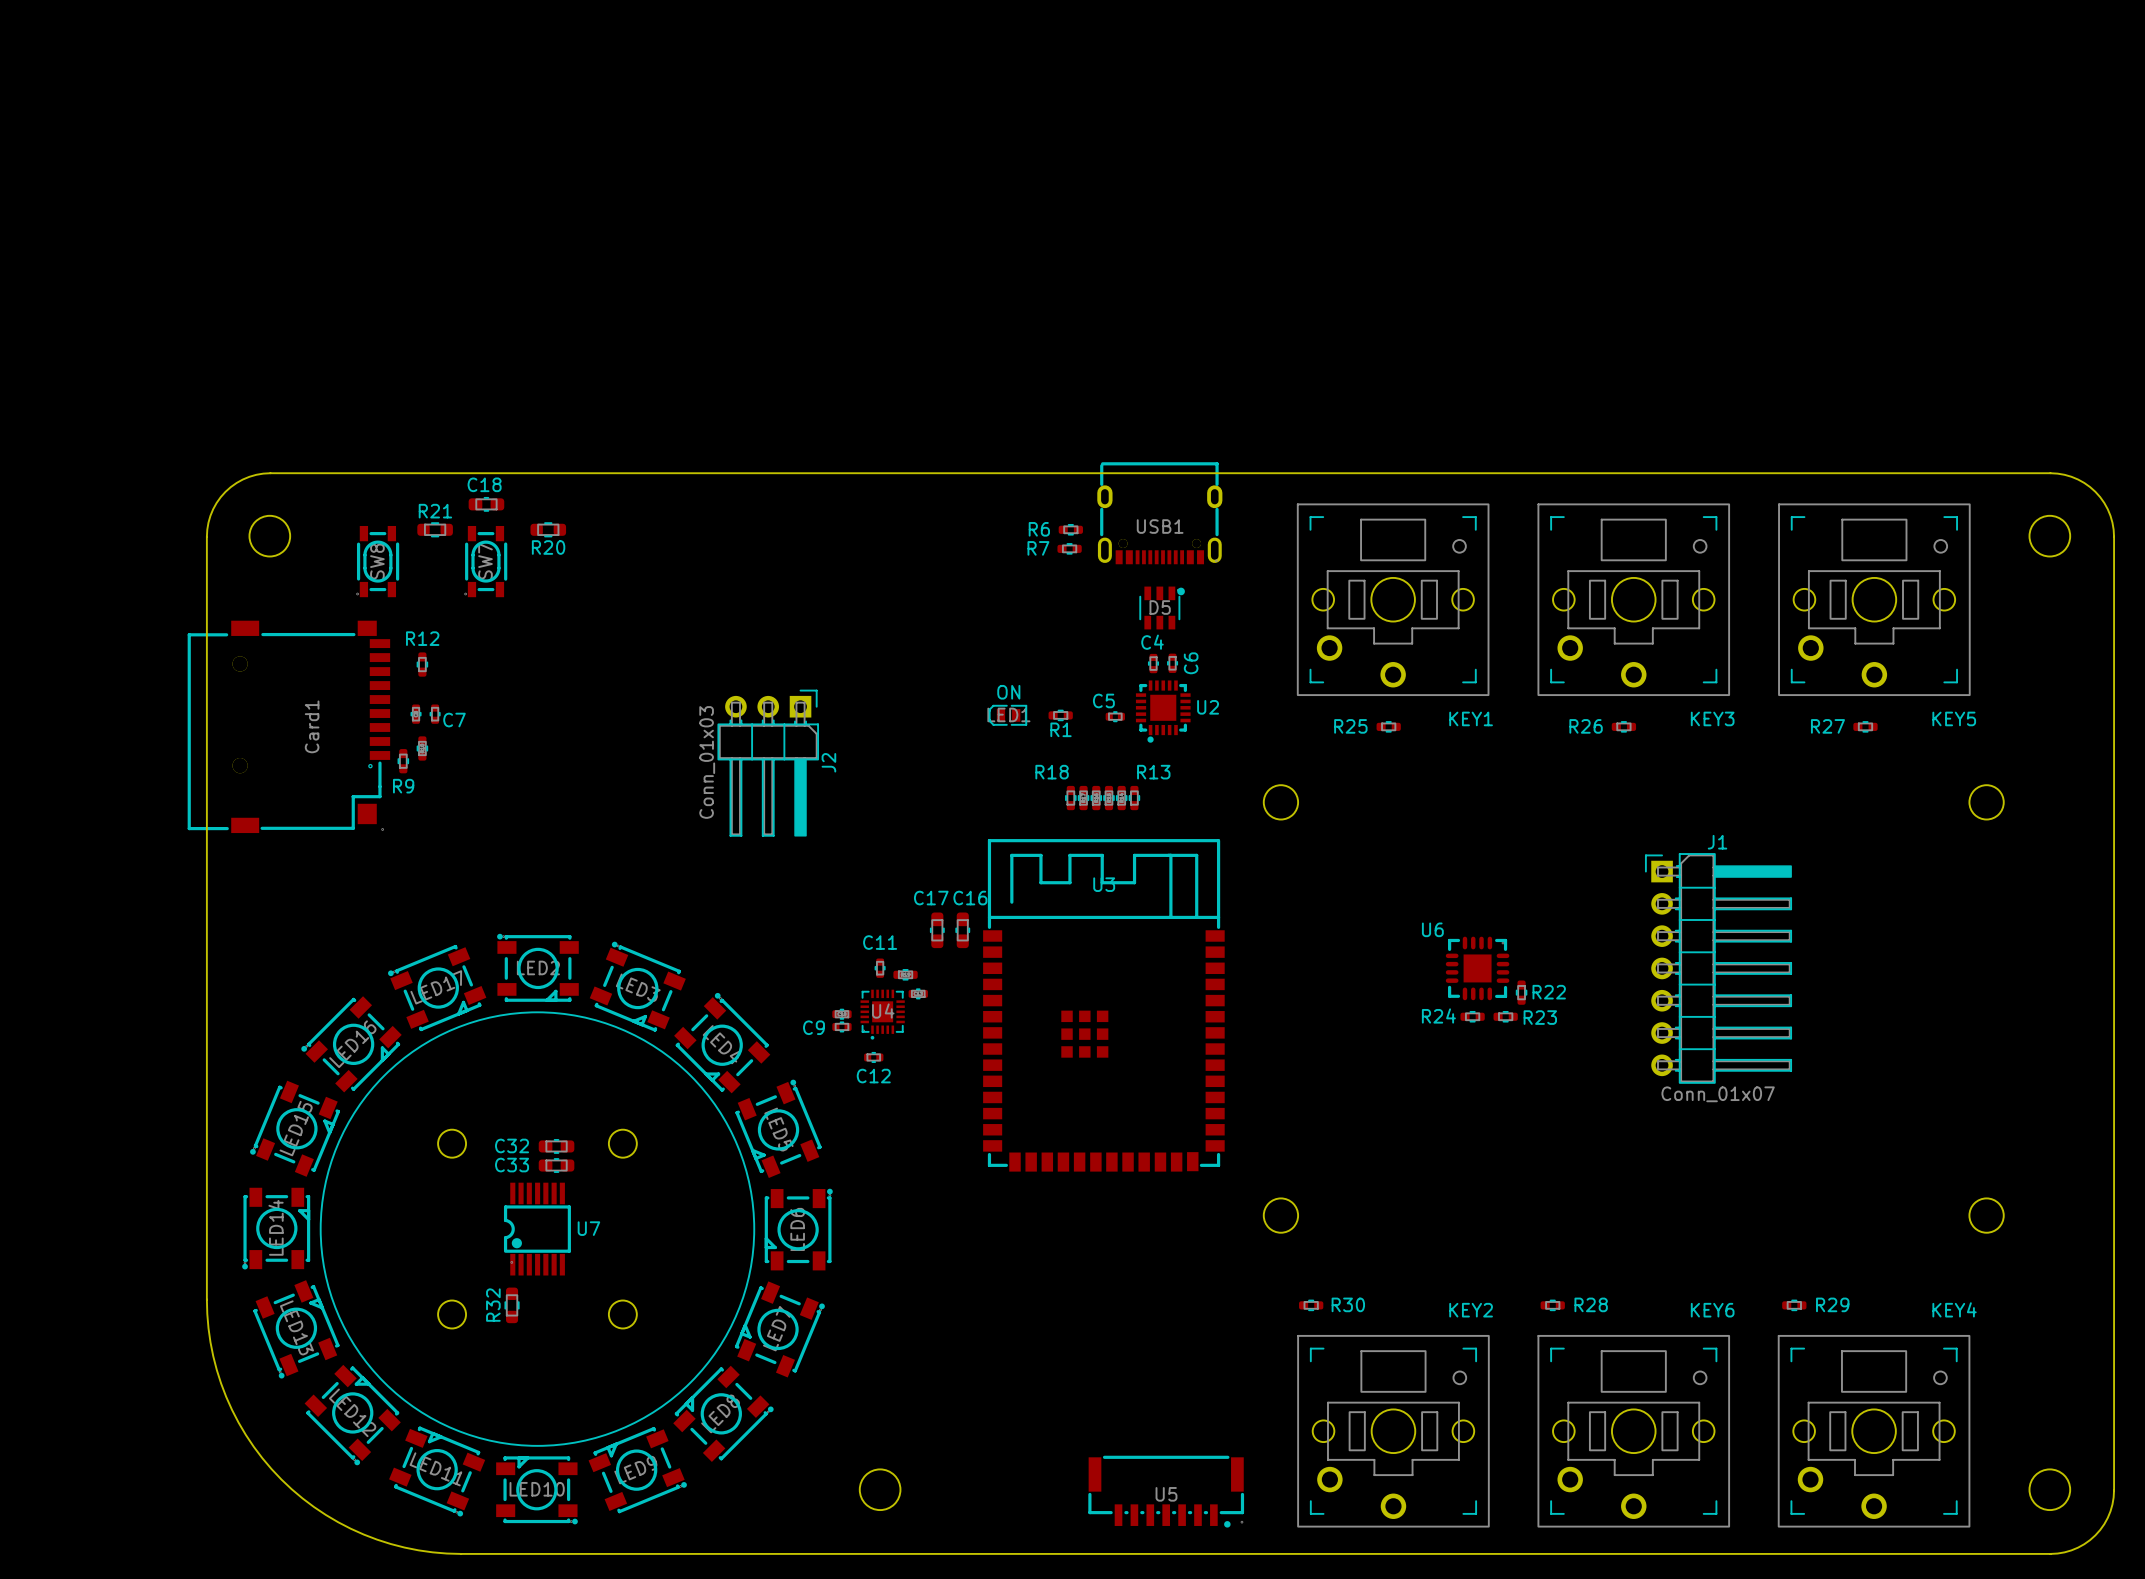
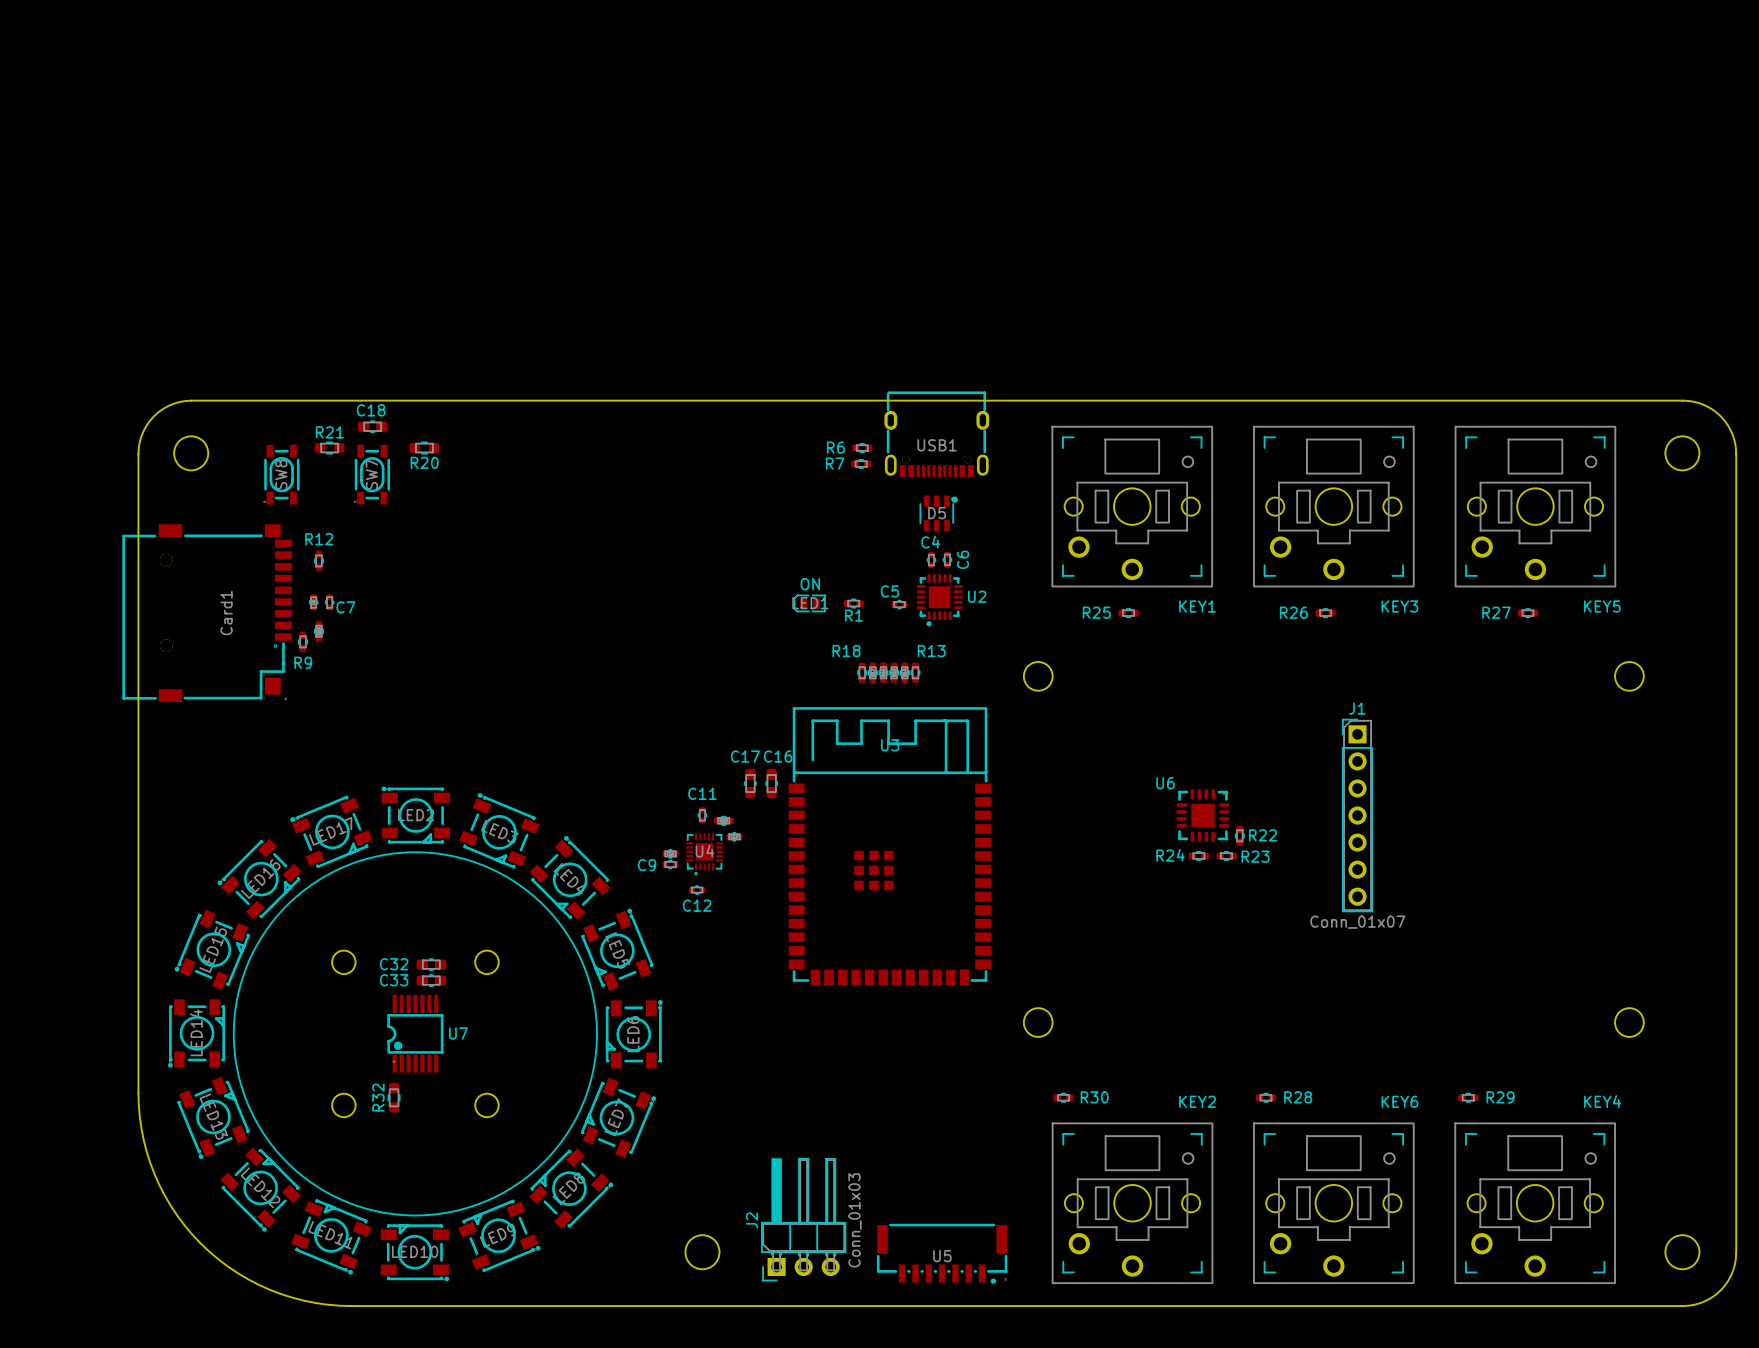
J2 rotation: 0° (768, 763) -> 180° (803, 1219)
J2 position: (768, 763) -> (803, 1219)
J1 footprint: [1645, 853, 1792, 1084] -> [1342, 719, 1373, 913]

